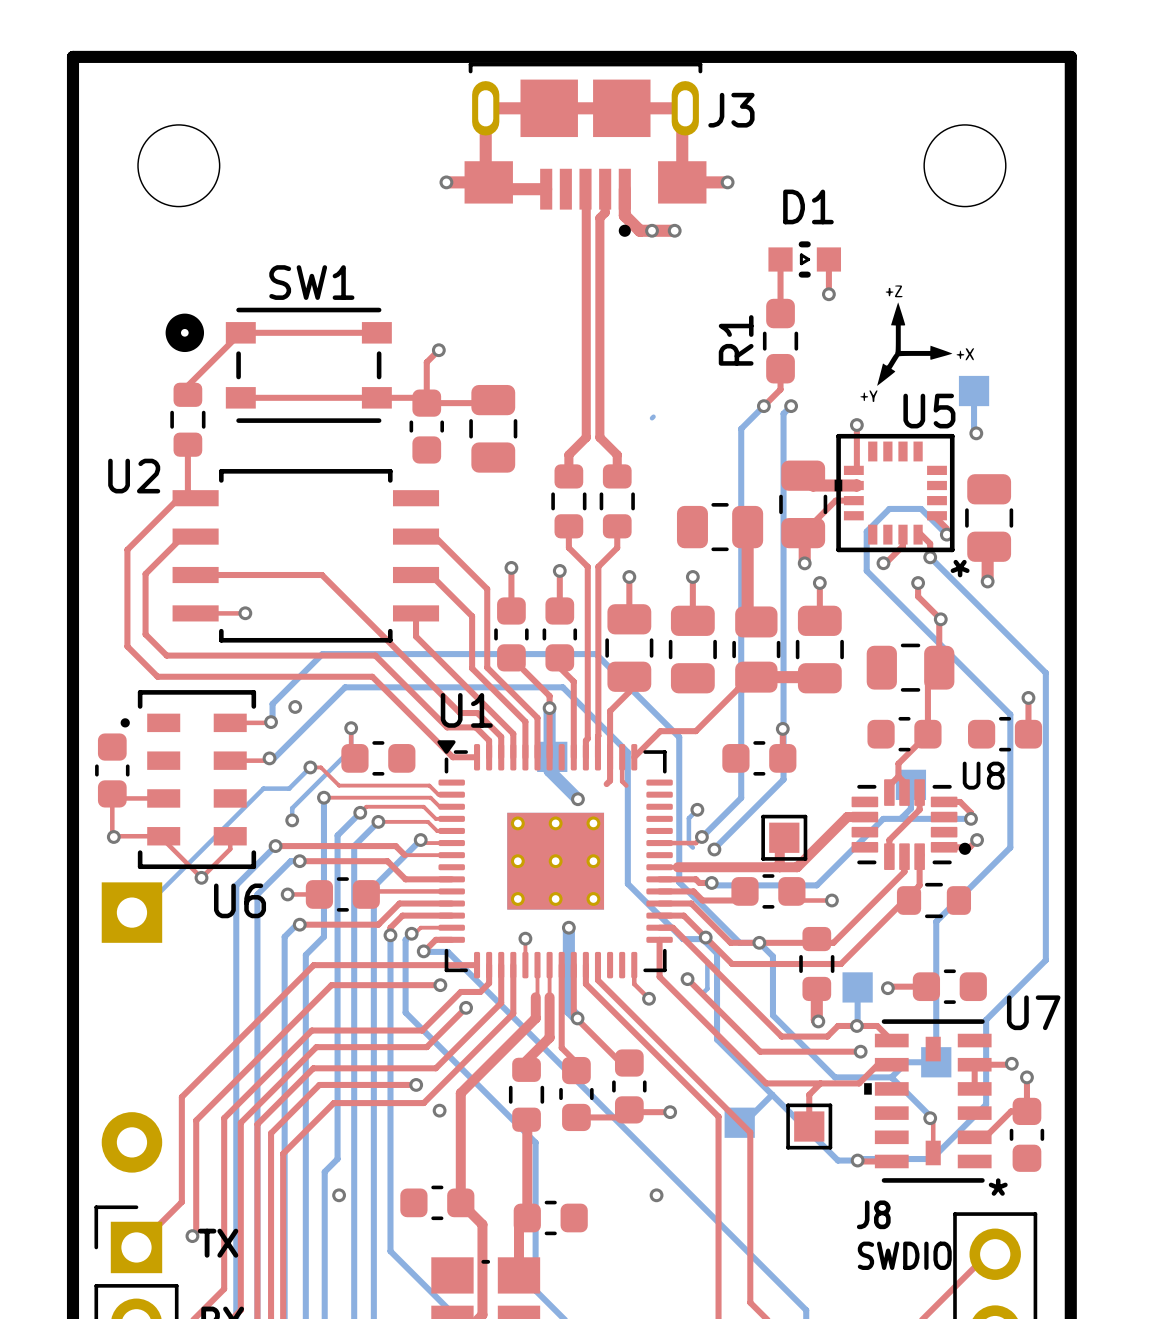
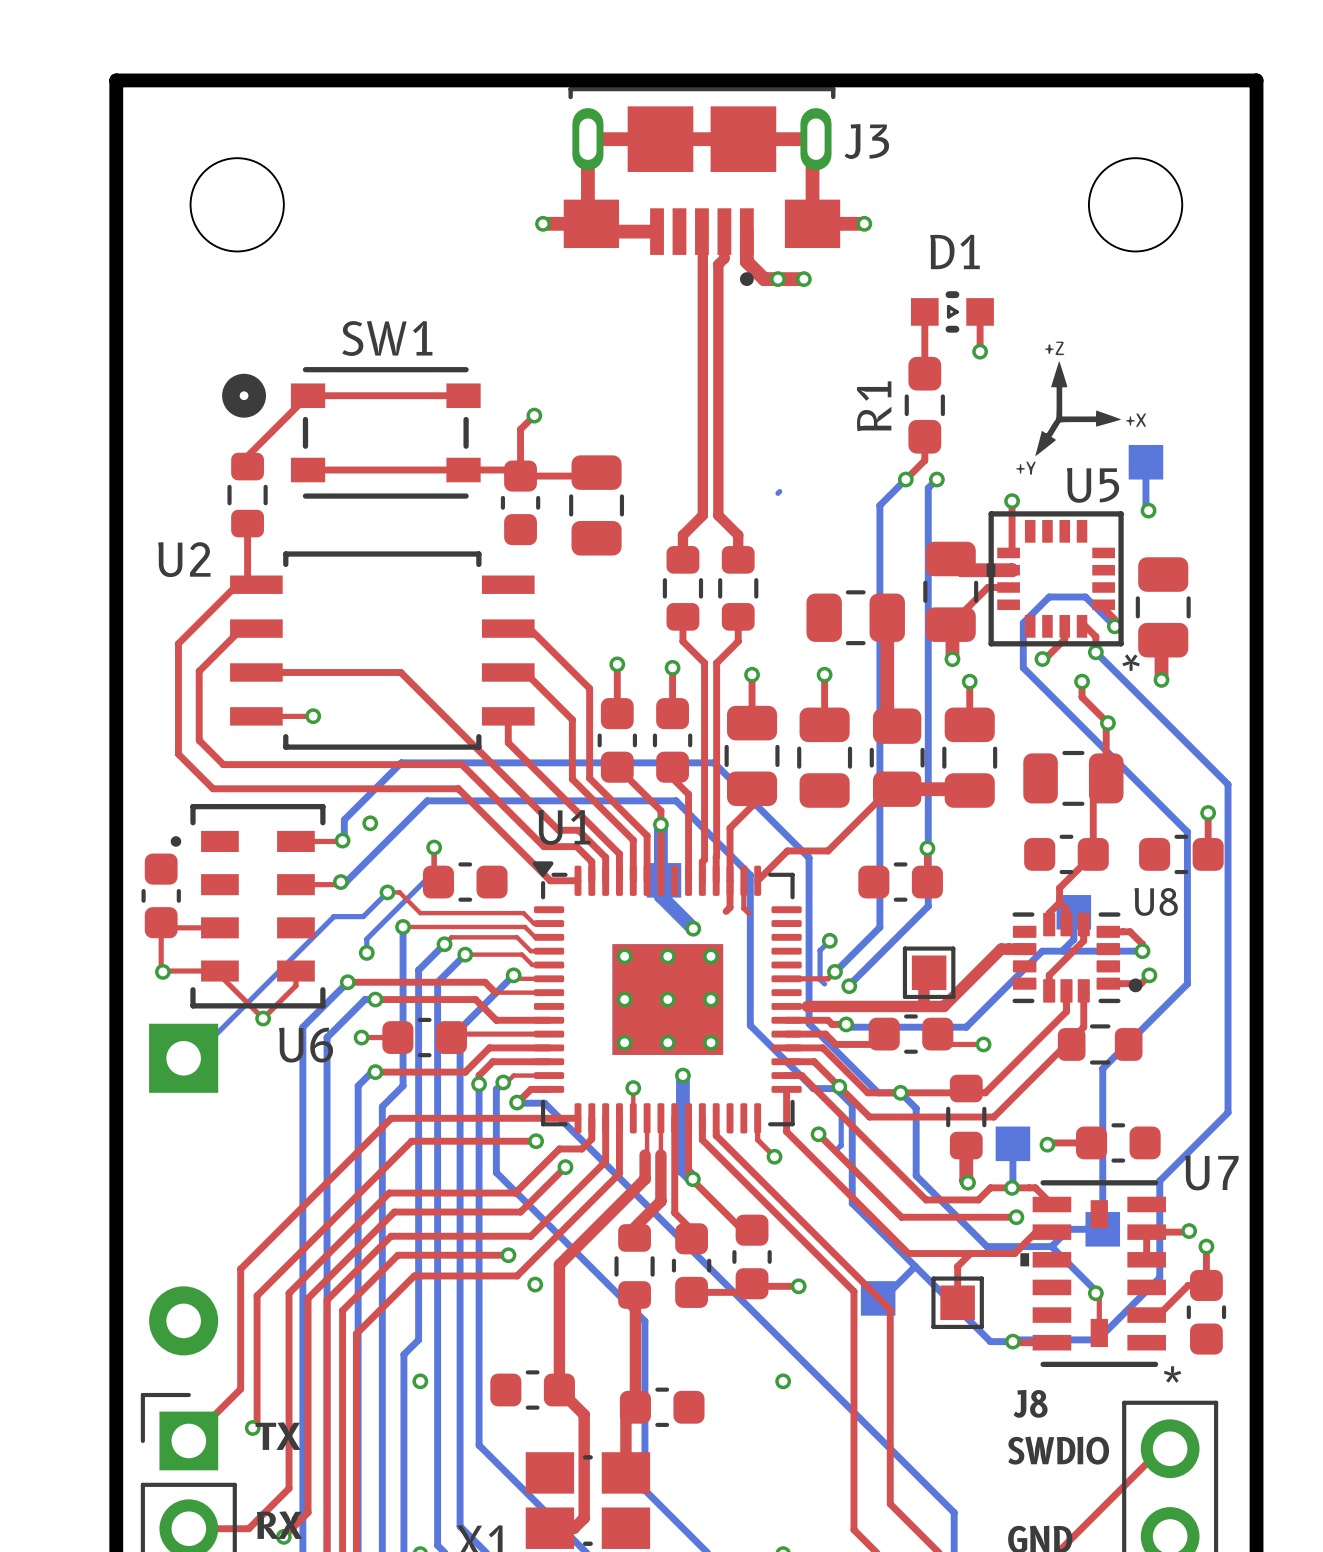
U8 footprint: [851, 779, 972, 870] -> [1012, 912, 1143, 1004]

